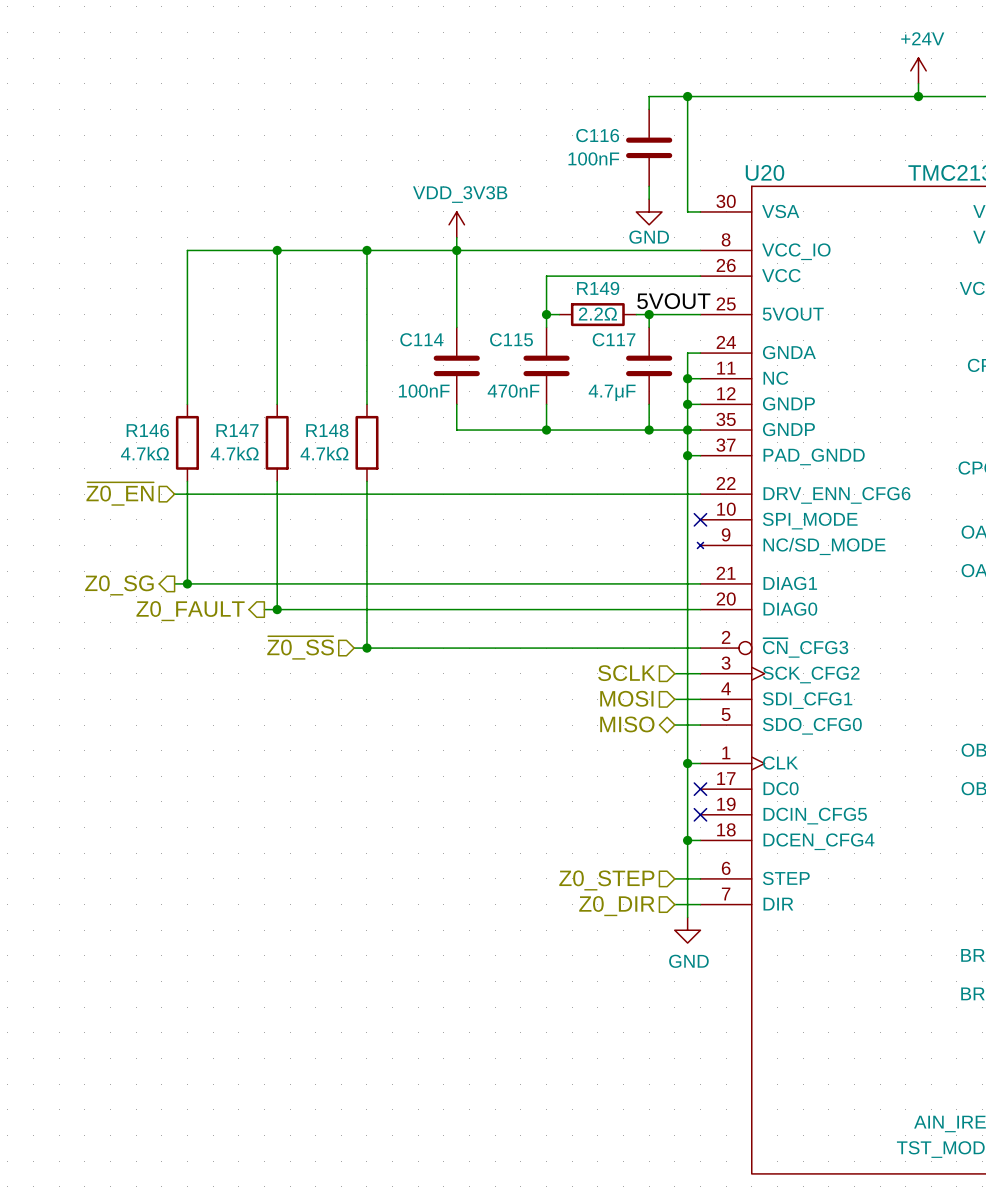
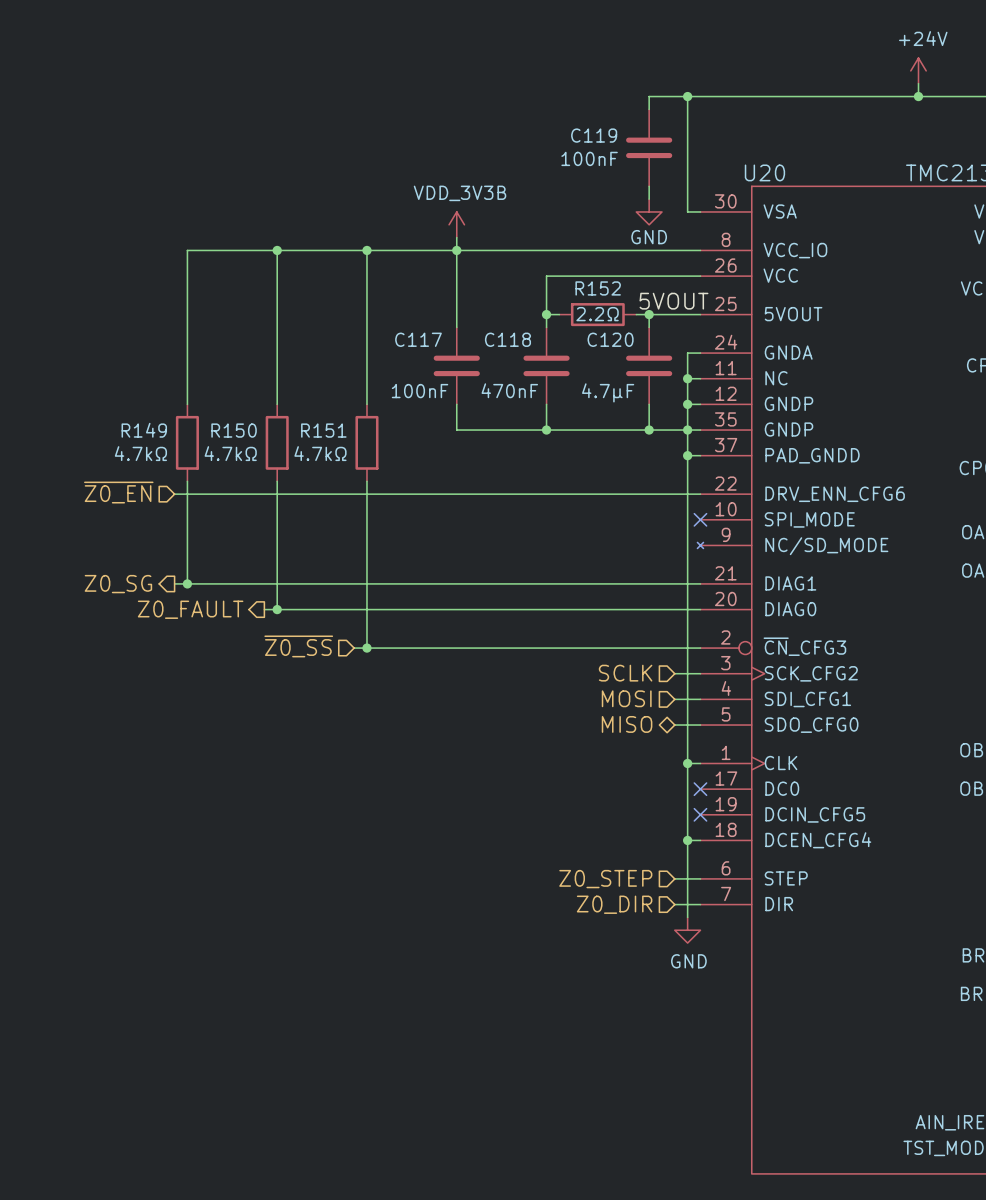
C116 name: C116 (597, 135) -> C119 (594, 135)
R149 name: R149 (598, 288) -> R152 (598, 288)
C114 name: C114 (421, 339) -> C117 (418, 339)
C115 name: C115 (511, 339) -> C118 (507, 339)
C117 name: C117 (614, 339) -> C120 (610, 339)
R146 name: R146 (147, 430) -> R149 (144, 430)
R147 name: R147 (237, 430) -> R150 (234, 430)
R148 name: R148 (327, 430) -> R151 (323, 430)

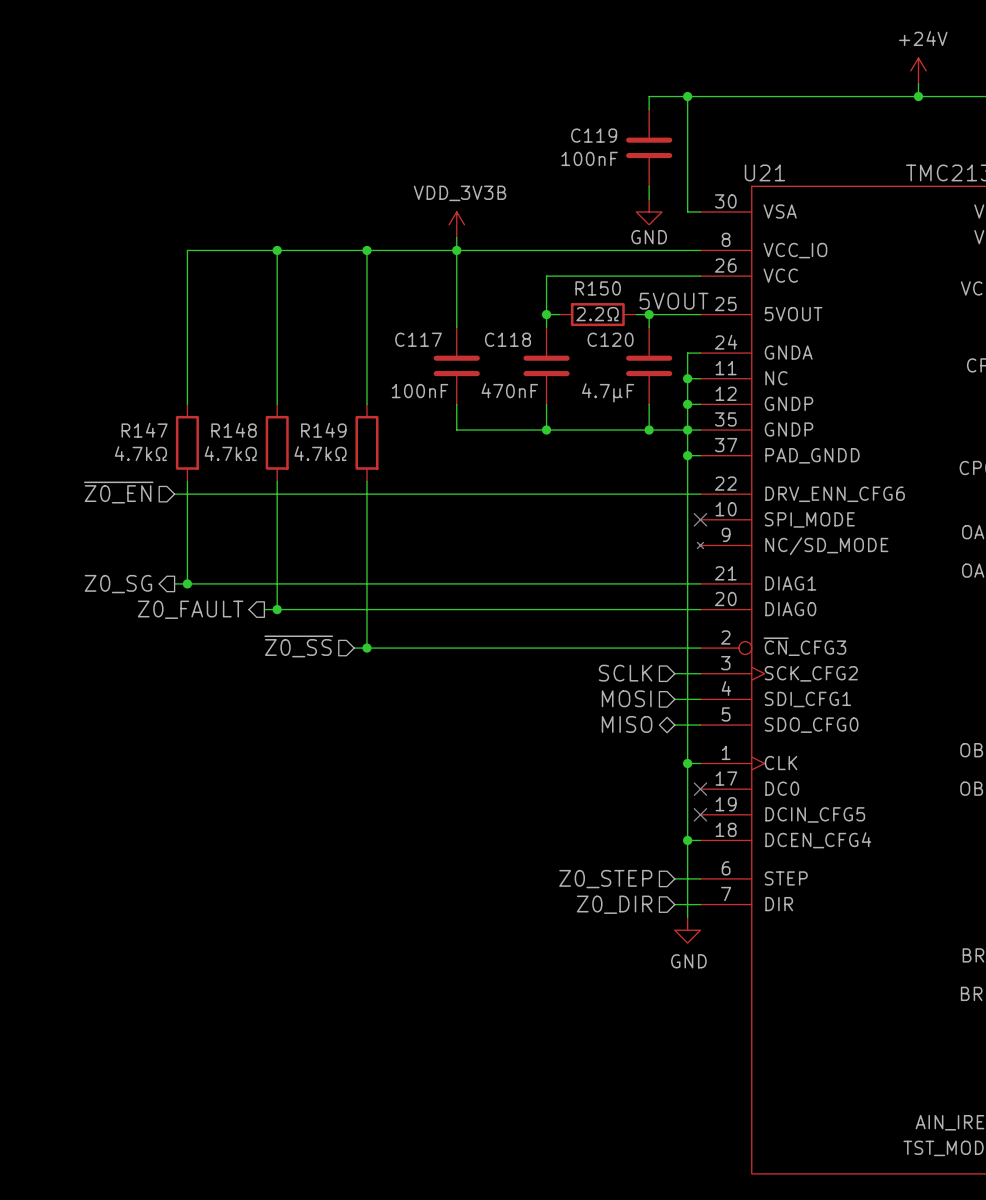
U20 name: U20 (764, 172) -> U21 (764, 172)
R152 name: R152 (598, 288) -> R150 (598, 288)
R149 name: R149 (144, 430) -> R147 (144, 430)
R150 name: R150 (234, 430) -> R148 (234, 430)
R151 name: R151 (323, 430) -> R149 (323, 430)

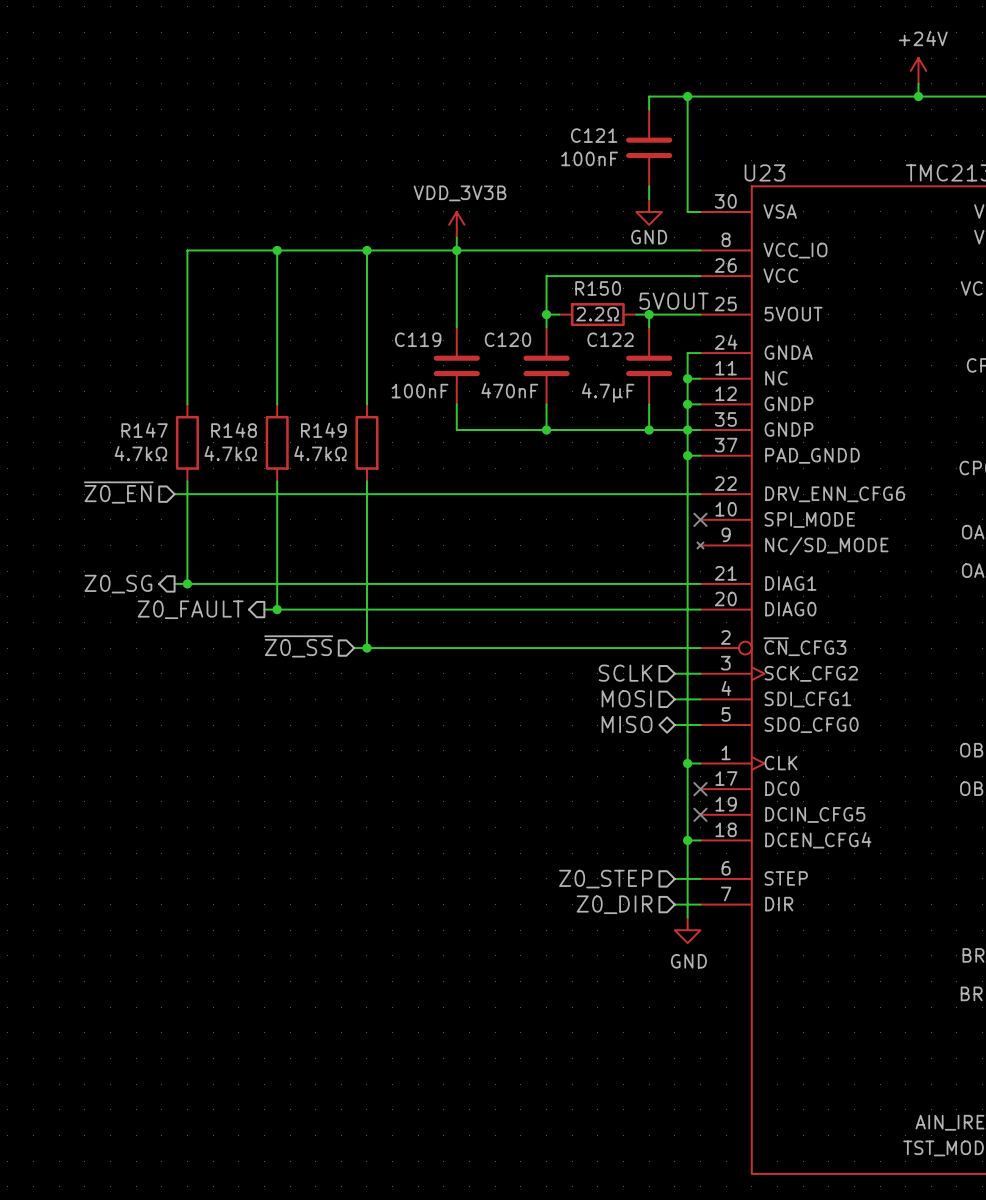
C119 name: C119 (594, 135) -> C121 (594, 135)
U21 name: U21 (764, 172) -> U23 (764, 172)
C117 name: C117 (418, 339) -> C119 (418, 339)
C118 name: C118 (507, 339) -> C120 (507, 339)
C120 name: C120 (610, 339) -> C122 (610, 339)

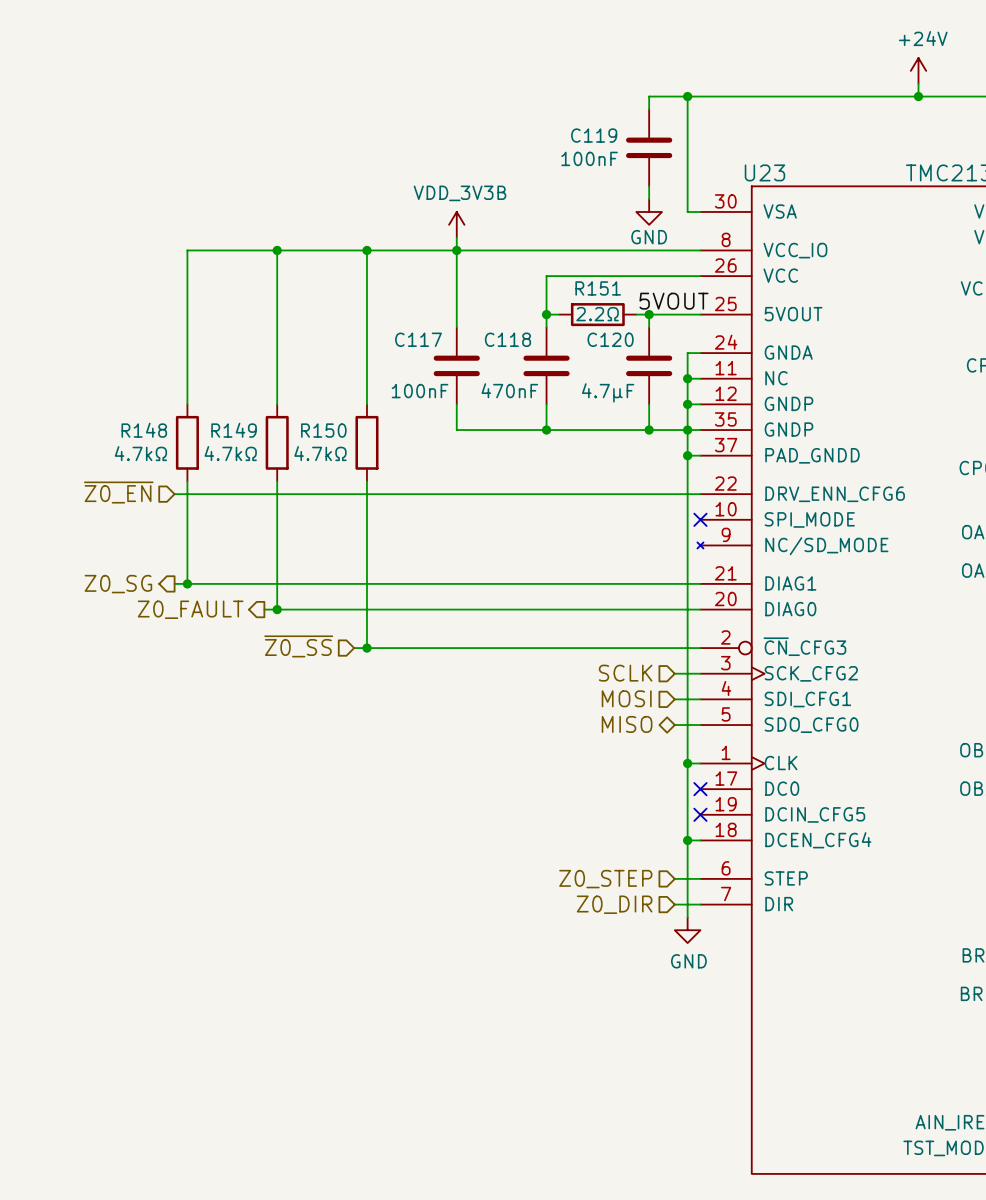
C121 name: C121 (594, 135) -> C119 (594, 135)
R150 name: R150 (598, 288) -> R151 (598, 288)
C119 name: C119 (418, 339) -> C117 (418, 339)
C120 name: C120 (507, 339) -> C118 (507, 339)
C122 name: C122 (610, 339) -> C120 (610, 339)
R147 name: R147 (144, 430) -> R148 (144, 430)
R148 name: R148 (234, 430) -> R149 (234, 430)
R149 name: R149 (323, 430) -> R150 (323, 430)

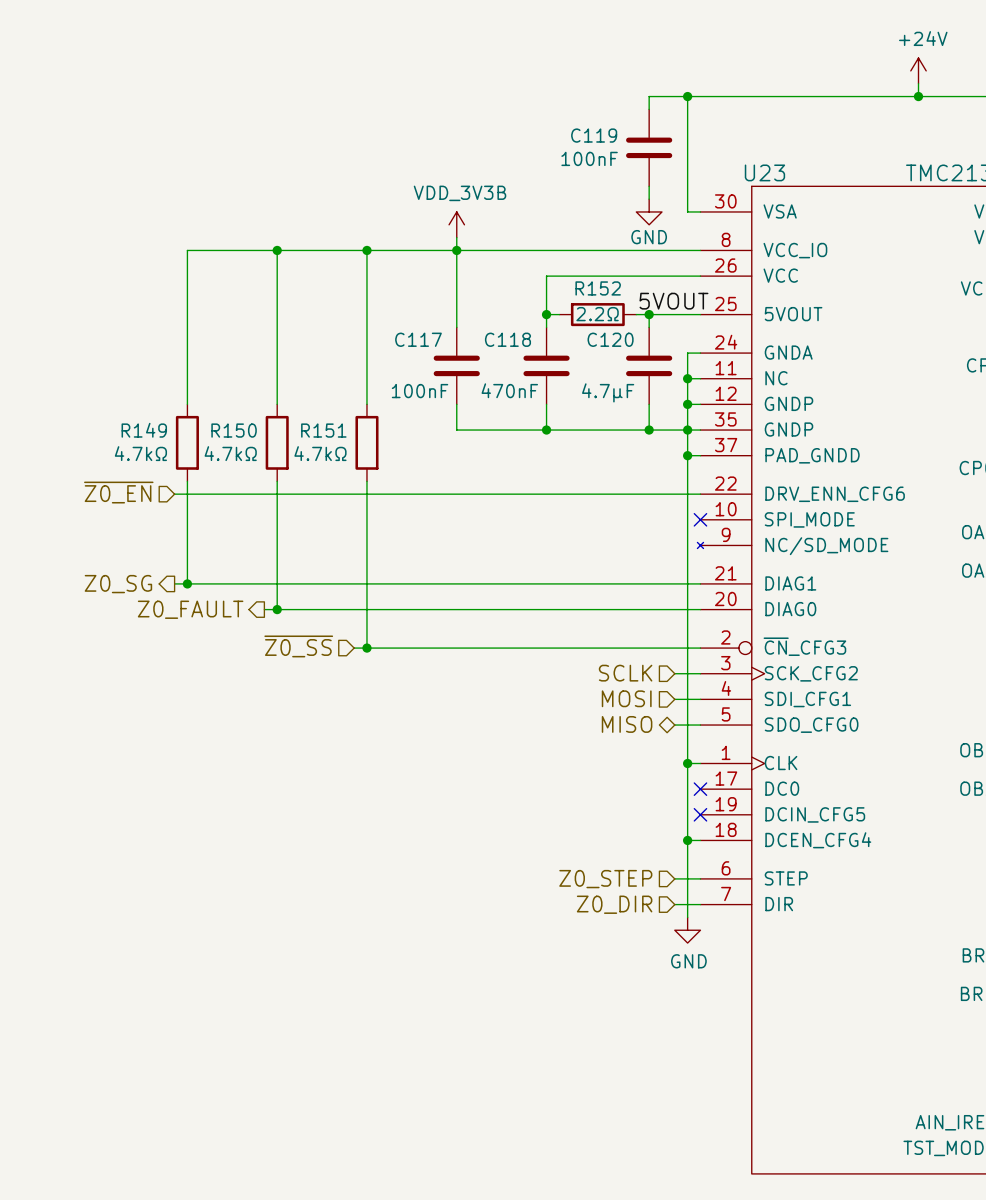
R151 name: R151 (598, 288) -> R152 (598, 288)
R148 name: R148 (144, 430) -> R149 (144, 430)
R149 name: R149 (234, 430) -> R150 (234, 430)
R150 name: R150 (323, 430) -> R151 (323, 430)

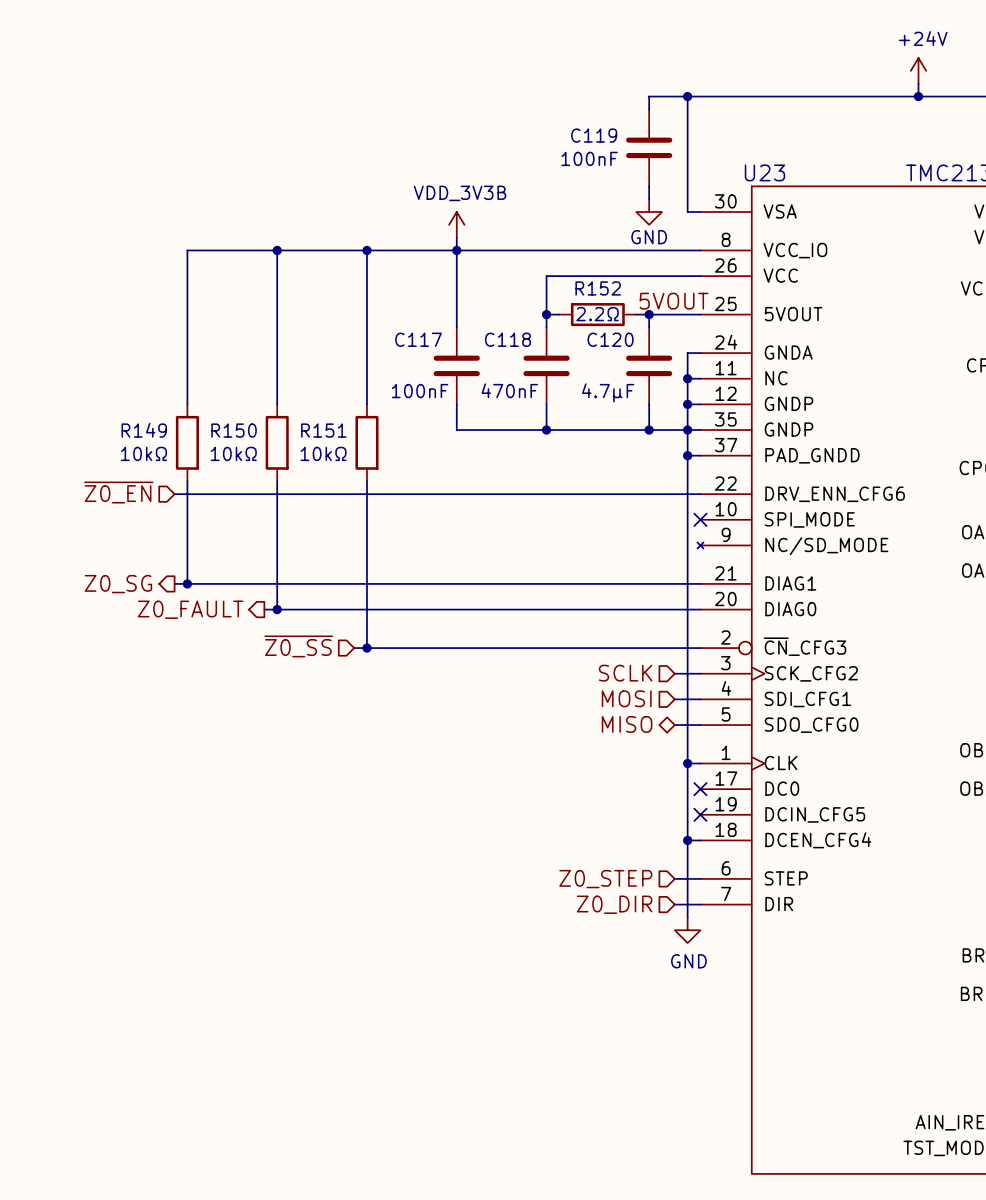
R149 value: 4.7kΩ (140, 453) -> 10kΩ (143, 453)
R150 value: 4.7kΩ (230, 453) -> 10kΩ (233, 453)
R151 value: 4.7kΩ (320, 453) -> 10kΩ (323, 453)

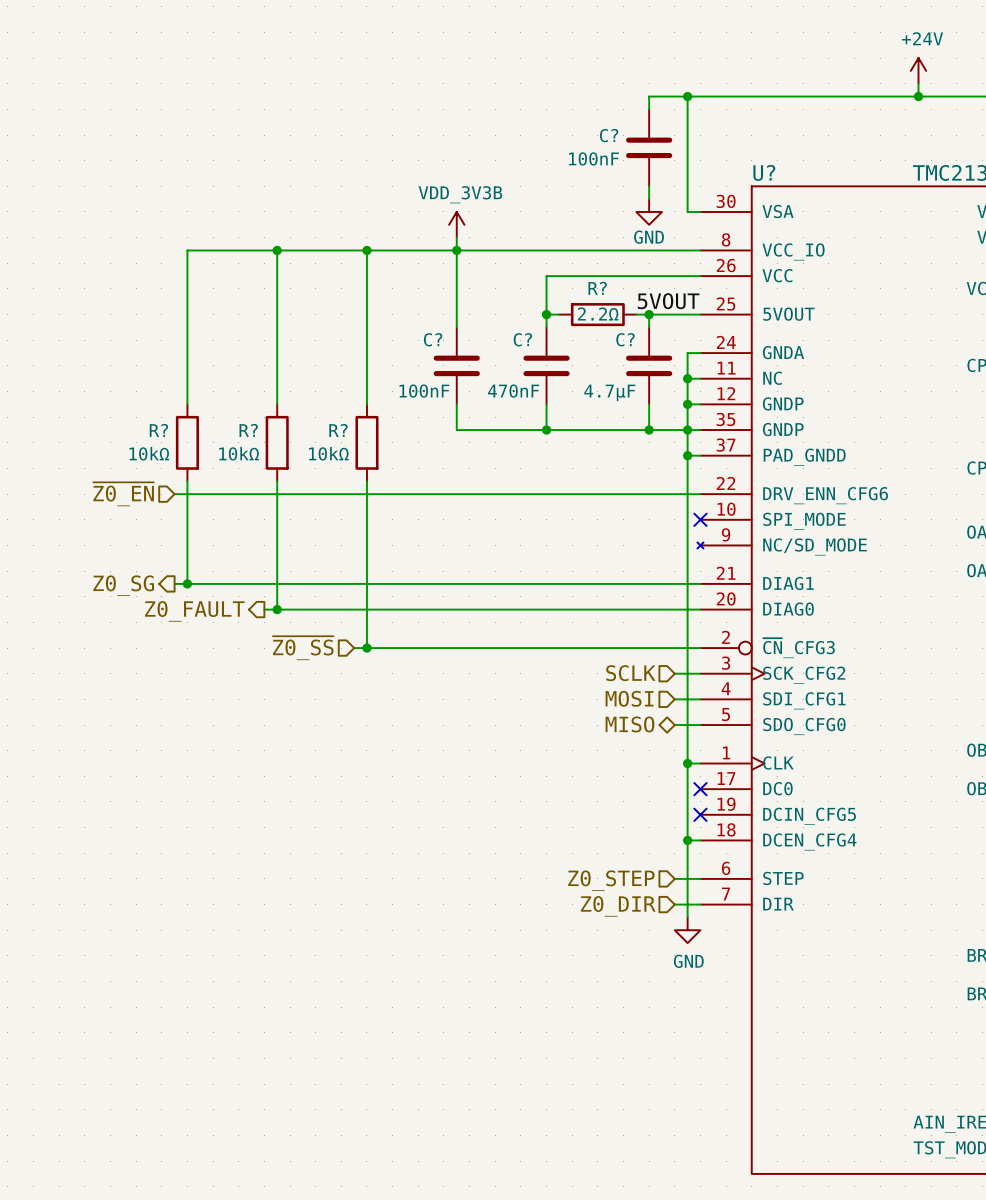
C119 name: C119 (594, 135) -> C? (609, 135)
U23 name: U23 (764, 172) -> U? (764, 172)
R152 name: R152 (598, 288) -> R? (597, 288)
C117 name: C117 (418, 339) -> C? (433, 339)
C118 name: C118 (507, 339) -> C? (522, 339)
C120 name: C120 (610, 339) -> C? (625, 339)
R149 name: R149 (144, 430) -> R? (158, 430)
R150 name: R150 (234, 430) -> R? (248, 430)
R151 name: R151 (323, 430) -> R? (338, 430)

